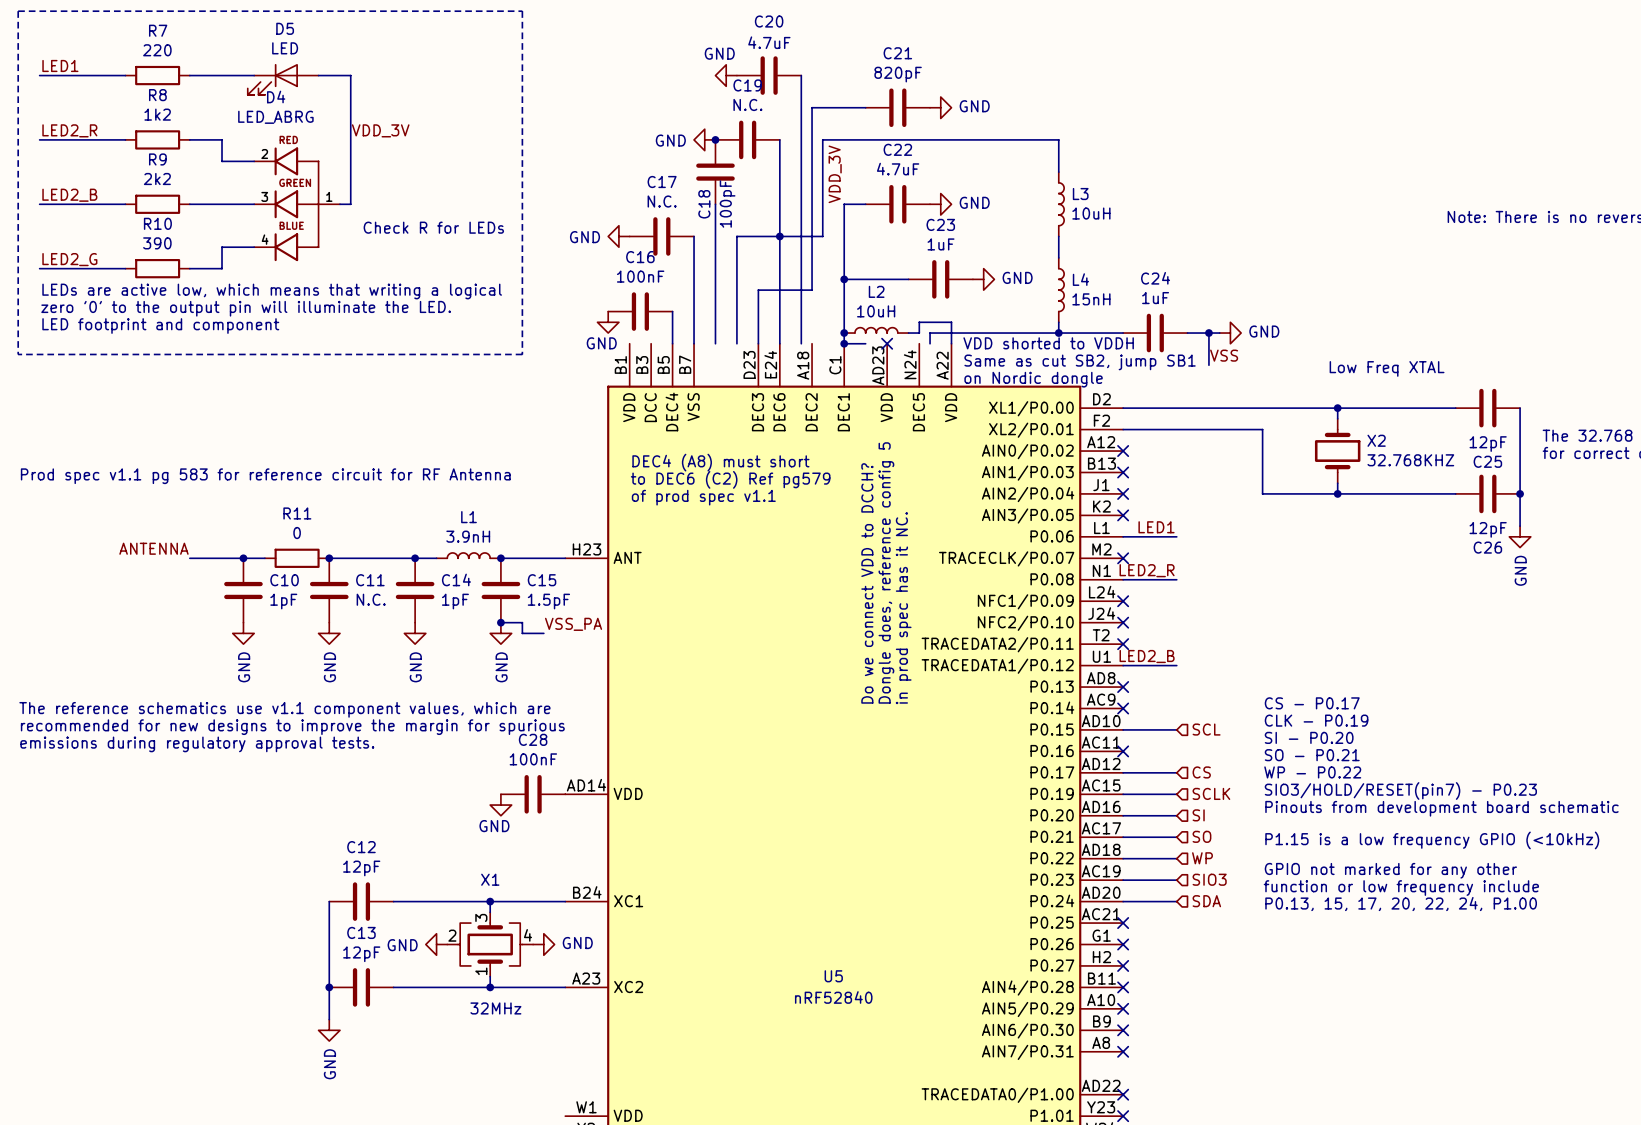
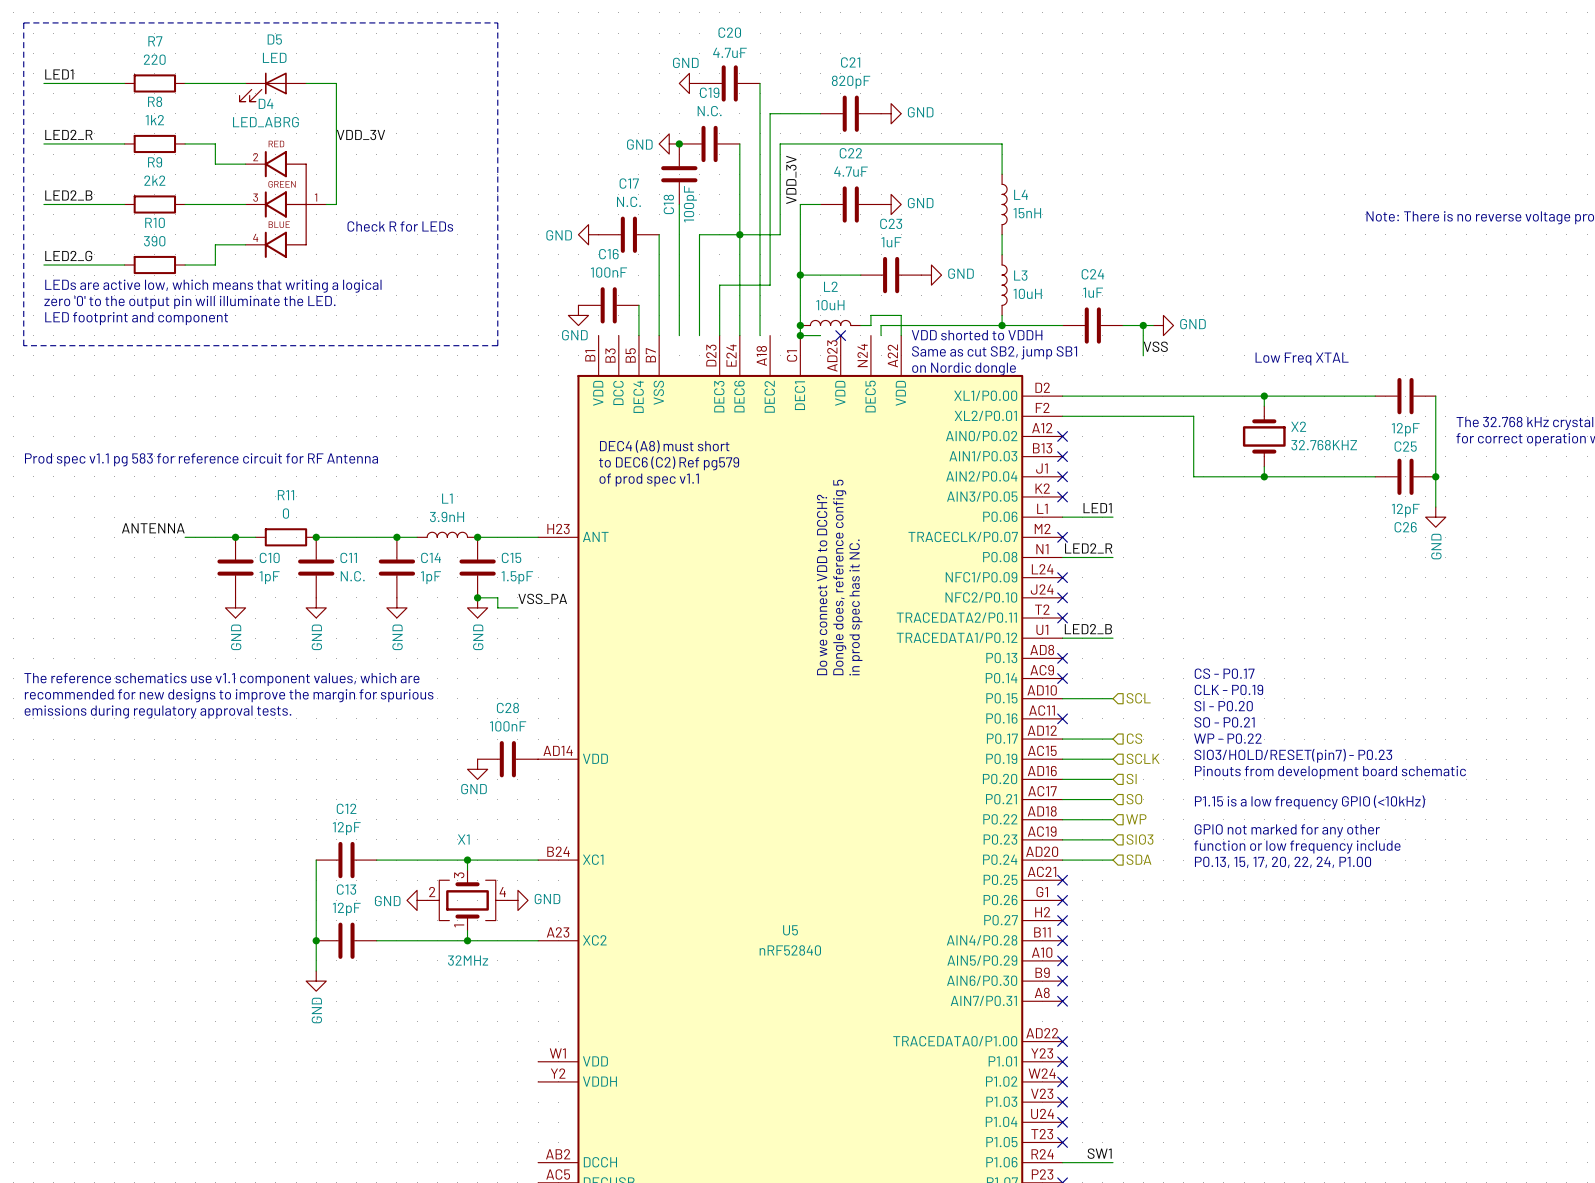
L3 name: L3 (1080, 194) -> L4 (1021, 194)
L3 value: 10uH (1091, 213) -> 15nH (1027, 213)
L4 name: L4 (1080, 279) -> L3 (1020, 275)
L4 value: 15nH (1091, 299) -> 10uH (1027, 293)

